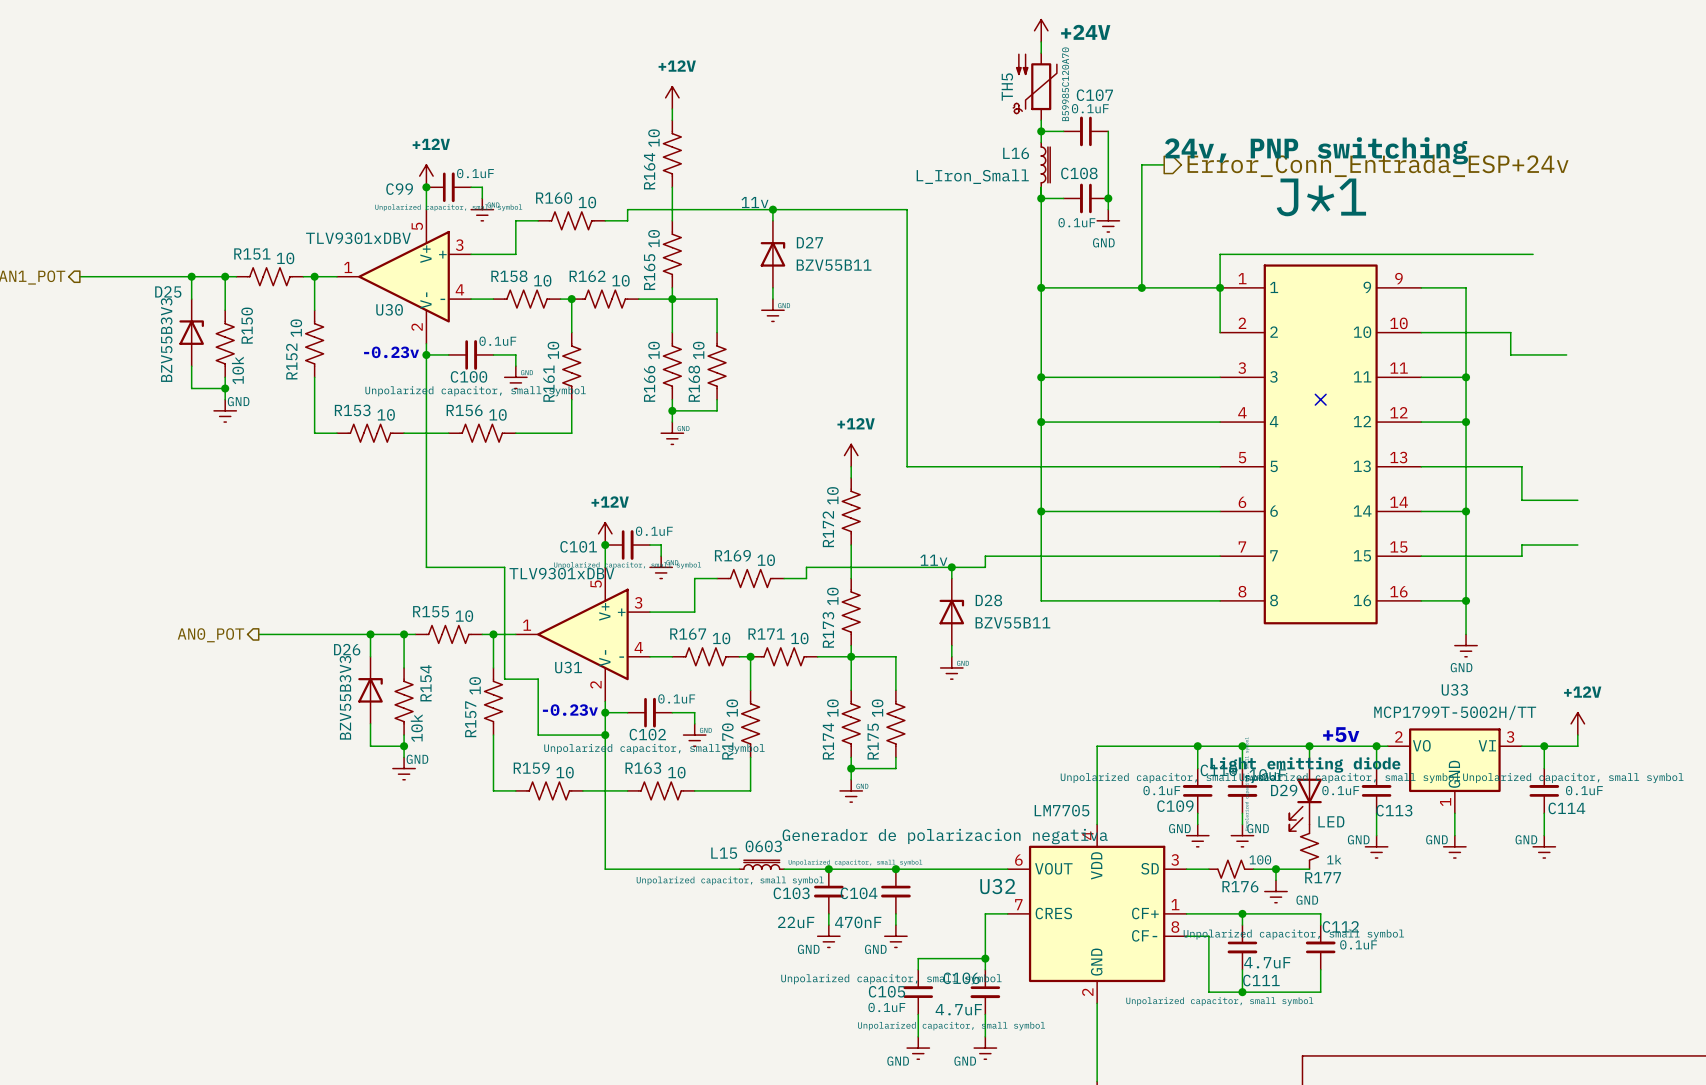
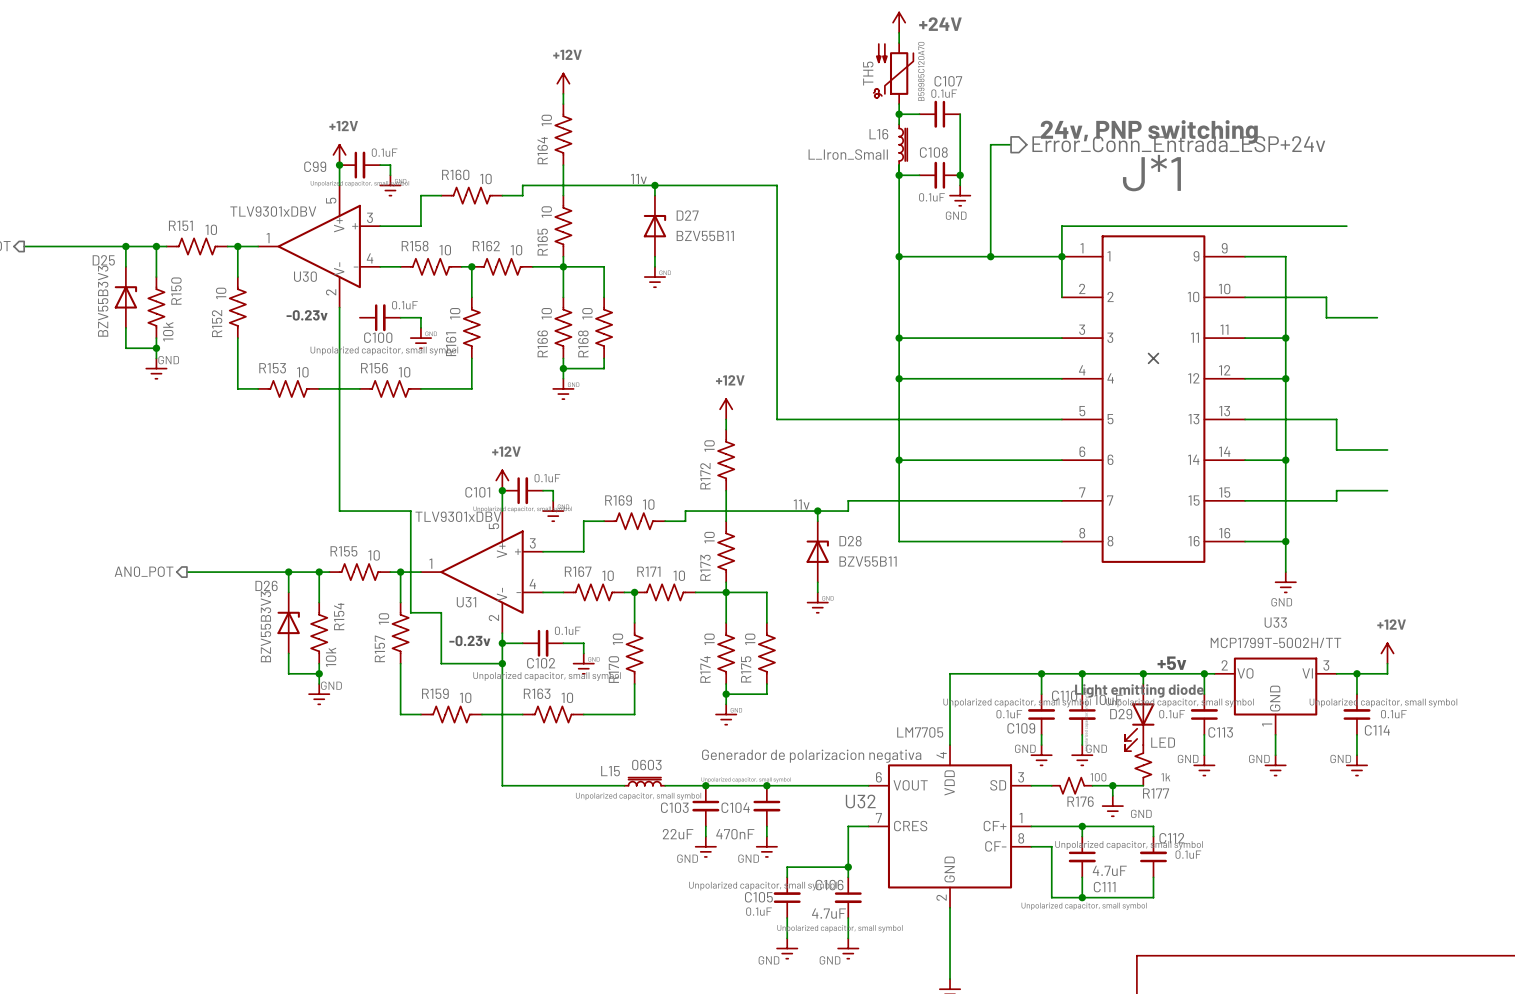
wire: (426, 354) (448, 354) -> none
junction: (426, 354) -> none

